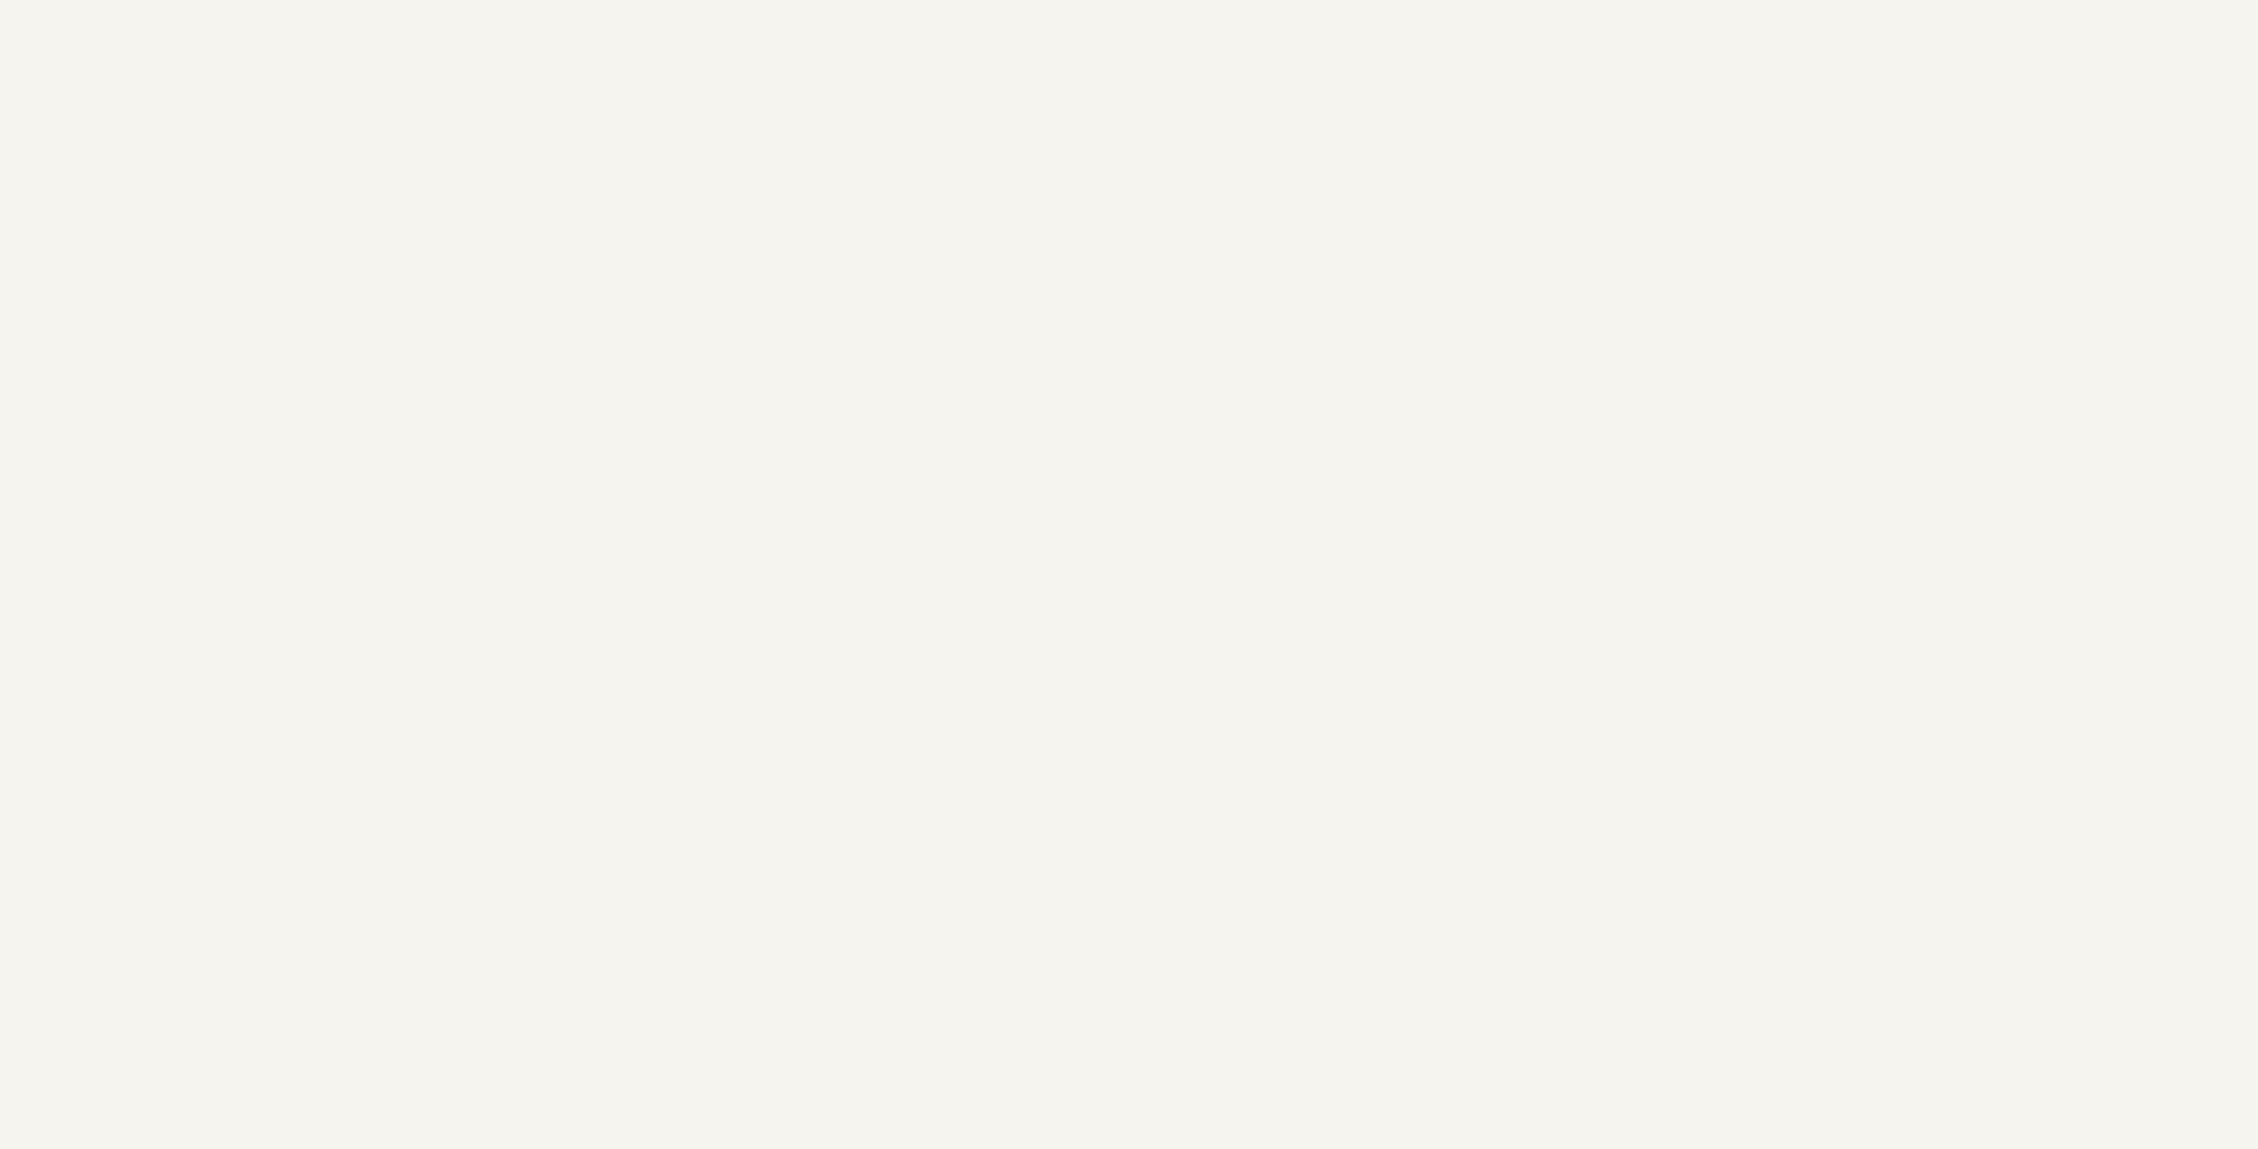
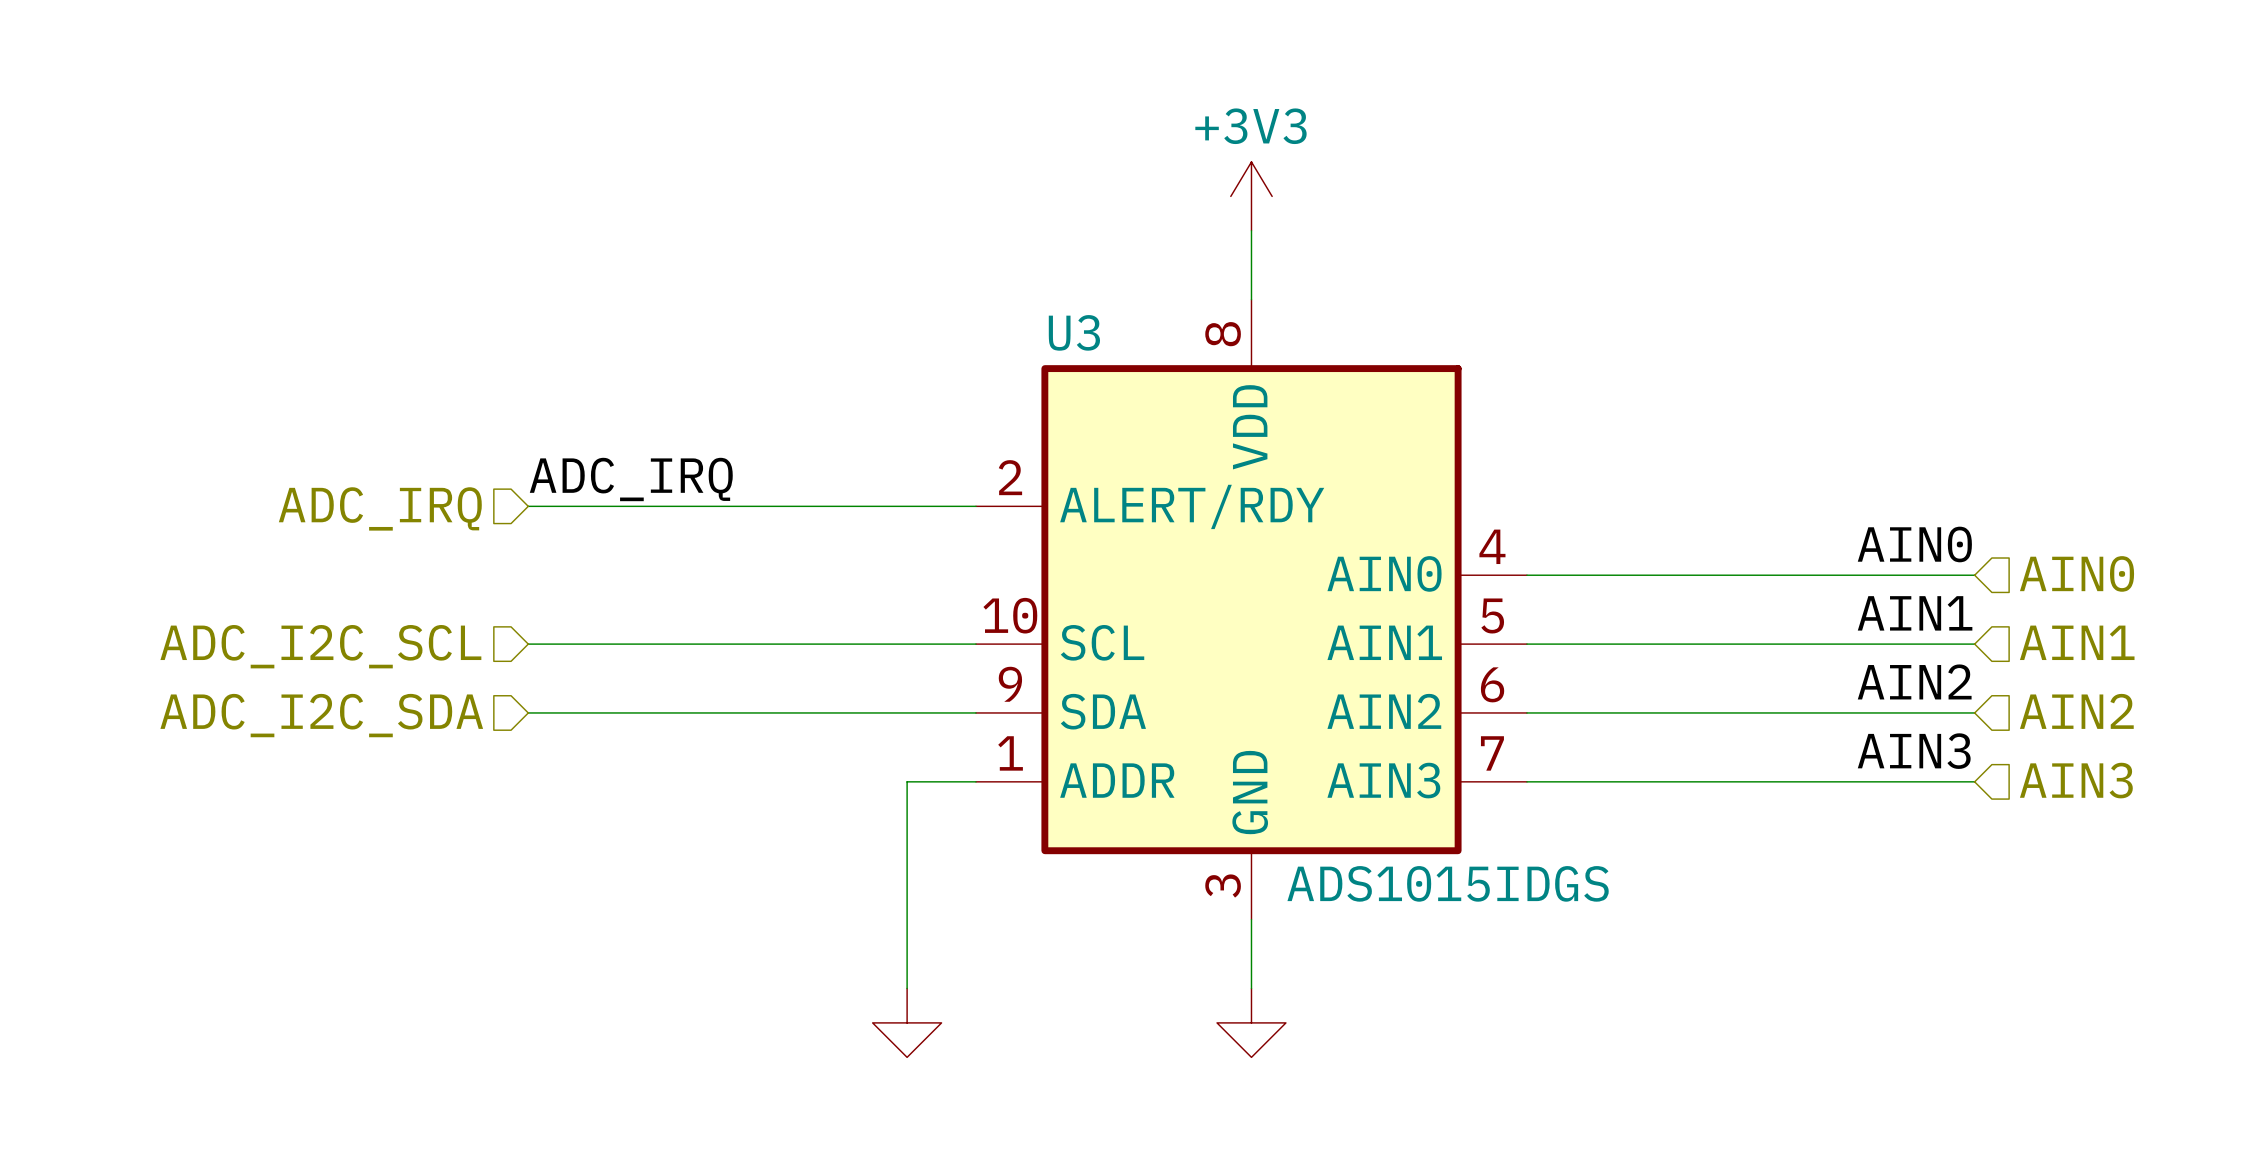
power symbol: none -> +3V3 (1251, 196)
wire: none -> (1251, 230) (1251, 299)
label: none -> ADC_IRQ (631, 479)
wire: none -> (528, 506) (975, 506)
hierarchical label: none -> ADC_IRQ (380, 508)
label: none -> AIN0 (1914, 544)
hierarchical label: none -> AIN0 (2077, 573)
wire: none -> (1526, 575) (1974, 575)
U3: none -> ADS1015IDGS (1251, 609)
label: none -> AIN1 (1915, 613)
hierarchical label: none -> ADC_I2C_SCL (320, 646)
hierarchical label: none -> AIN1 (2077, 642)
wire: none -> (528, 644) (975, 644)
wire: none -> (1526, 644) (1974, 644)
label: none -> AIN2 (1914, 681)
hierarchical label: none -> ADC_I2C_SDA (321, 715)
hierarchical label: none -> AIN2 (2076, 711)
wire: none -> (528, 712) (975, 712)
wire: none -> (1526, 712) (1974, 712)
label: none -> AIN3 (1914, 751)
hierarchical label: none -> AIN3 (2076, 780)
wire: none -> (975, 781) (907, 781) (907, 988)
wire: none -> (1526, 781) (1974, 781)
wire: none -> (1251, 919) (1251, 988)
power symbol: none -> (907, 1022)
power symbol: none -> (1251, 1022)

